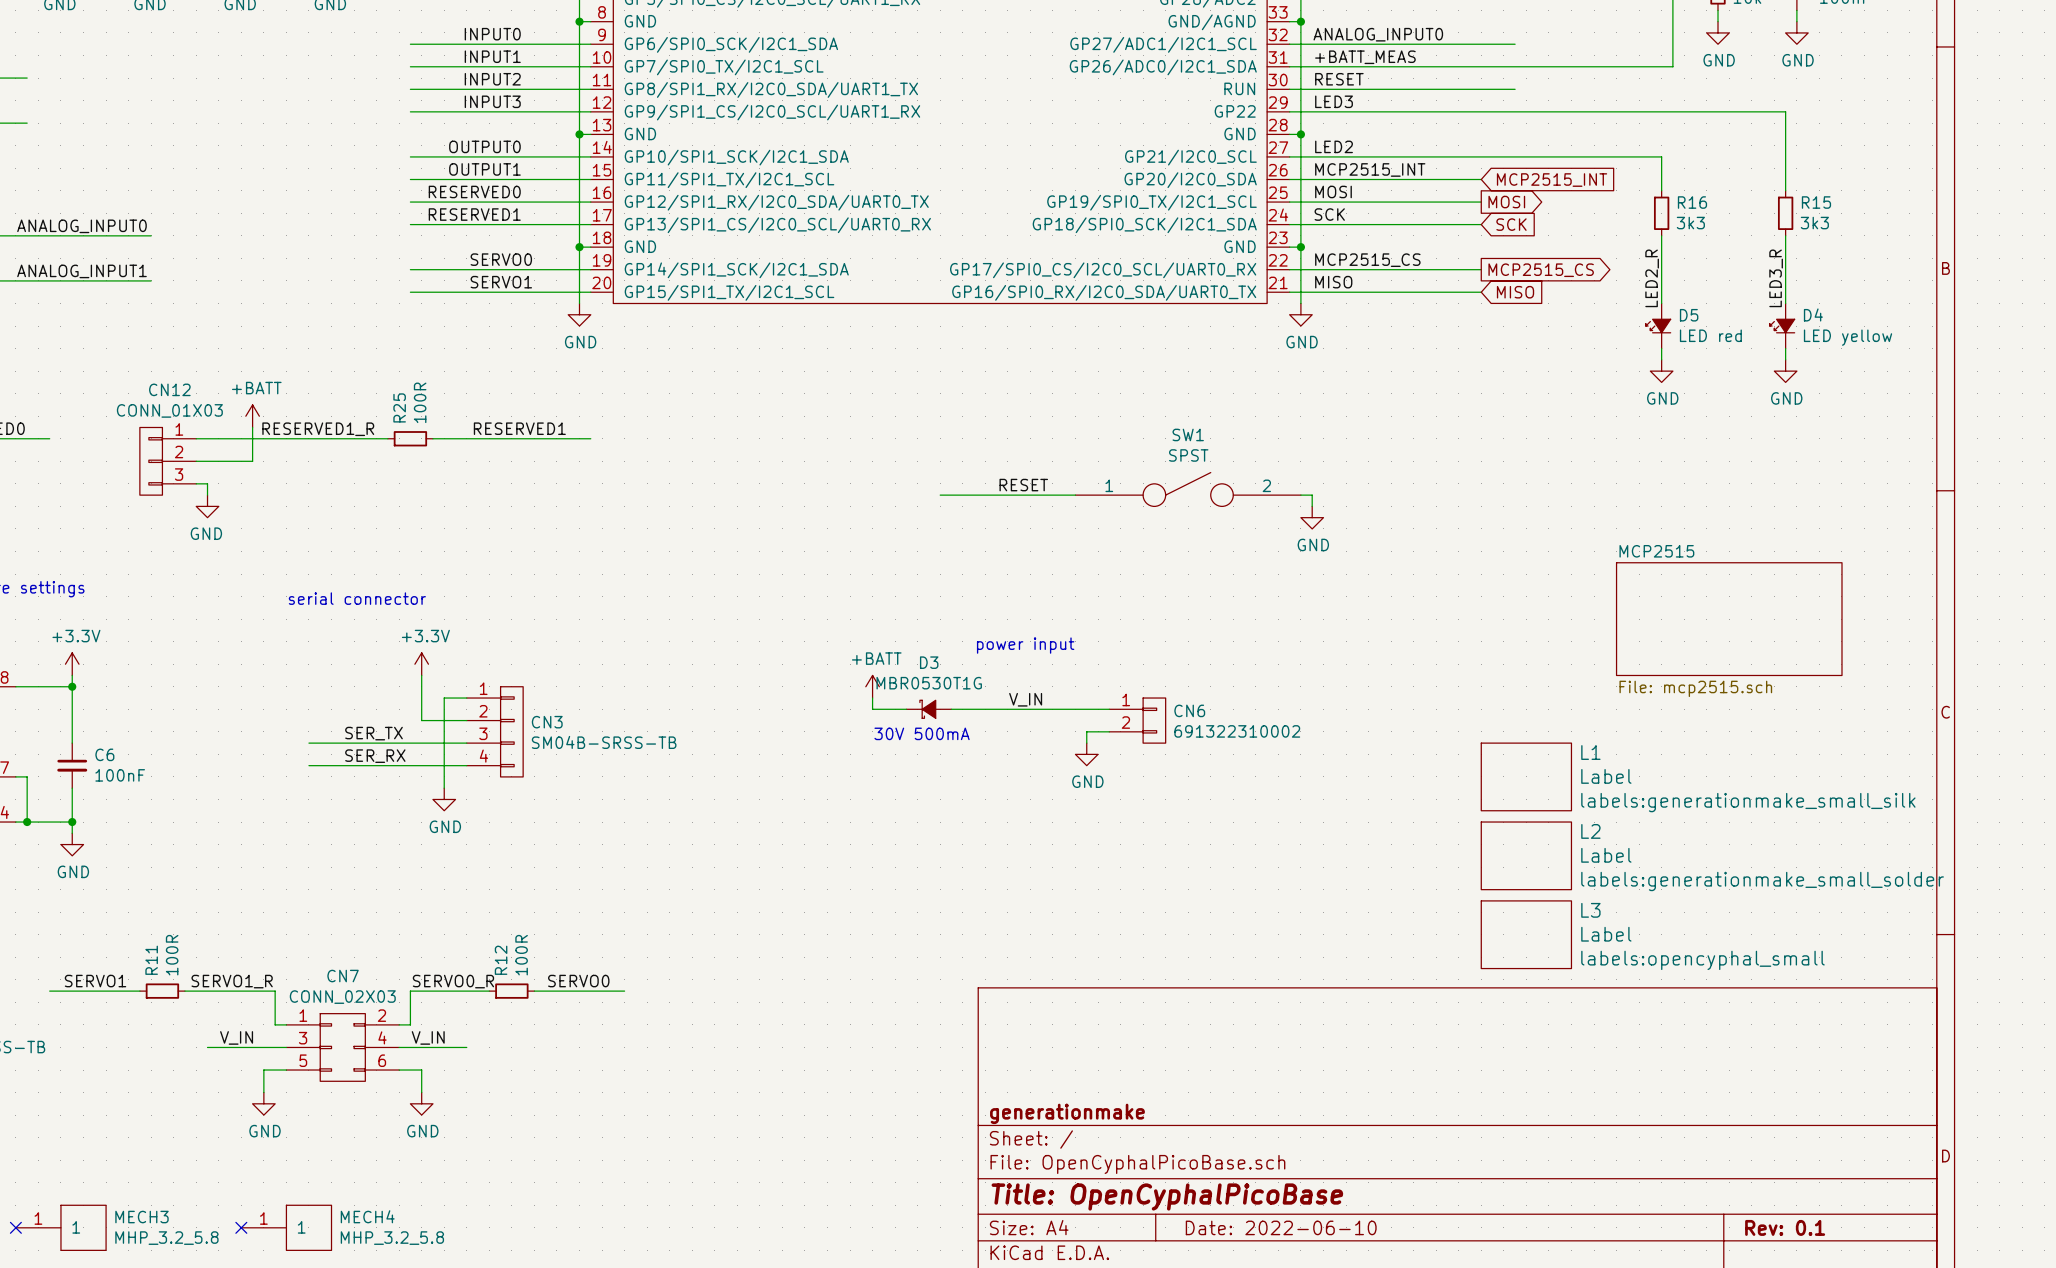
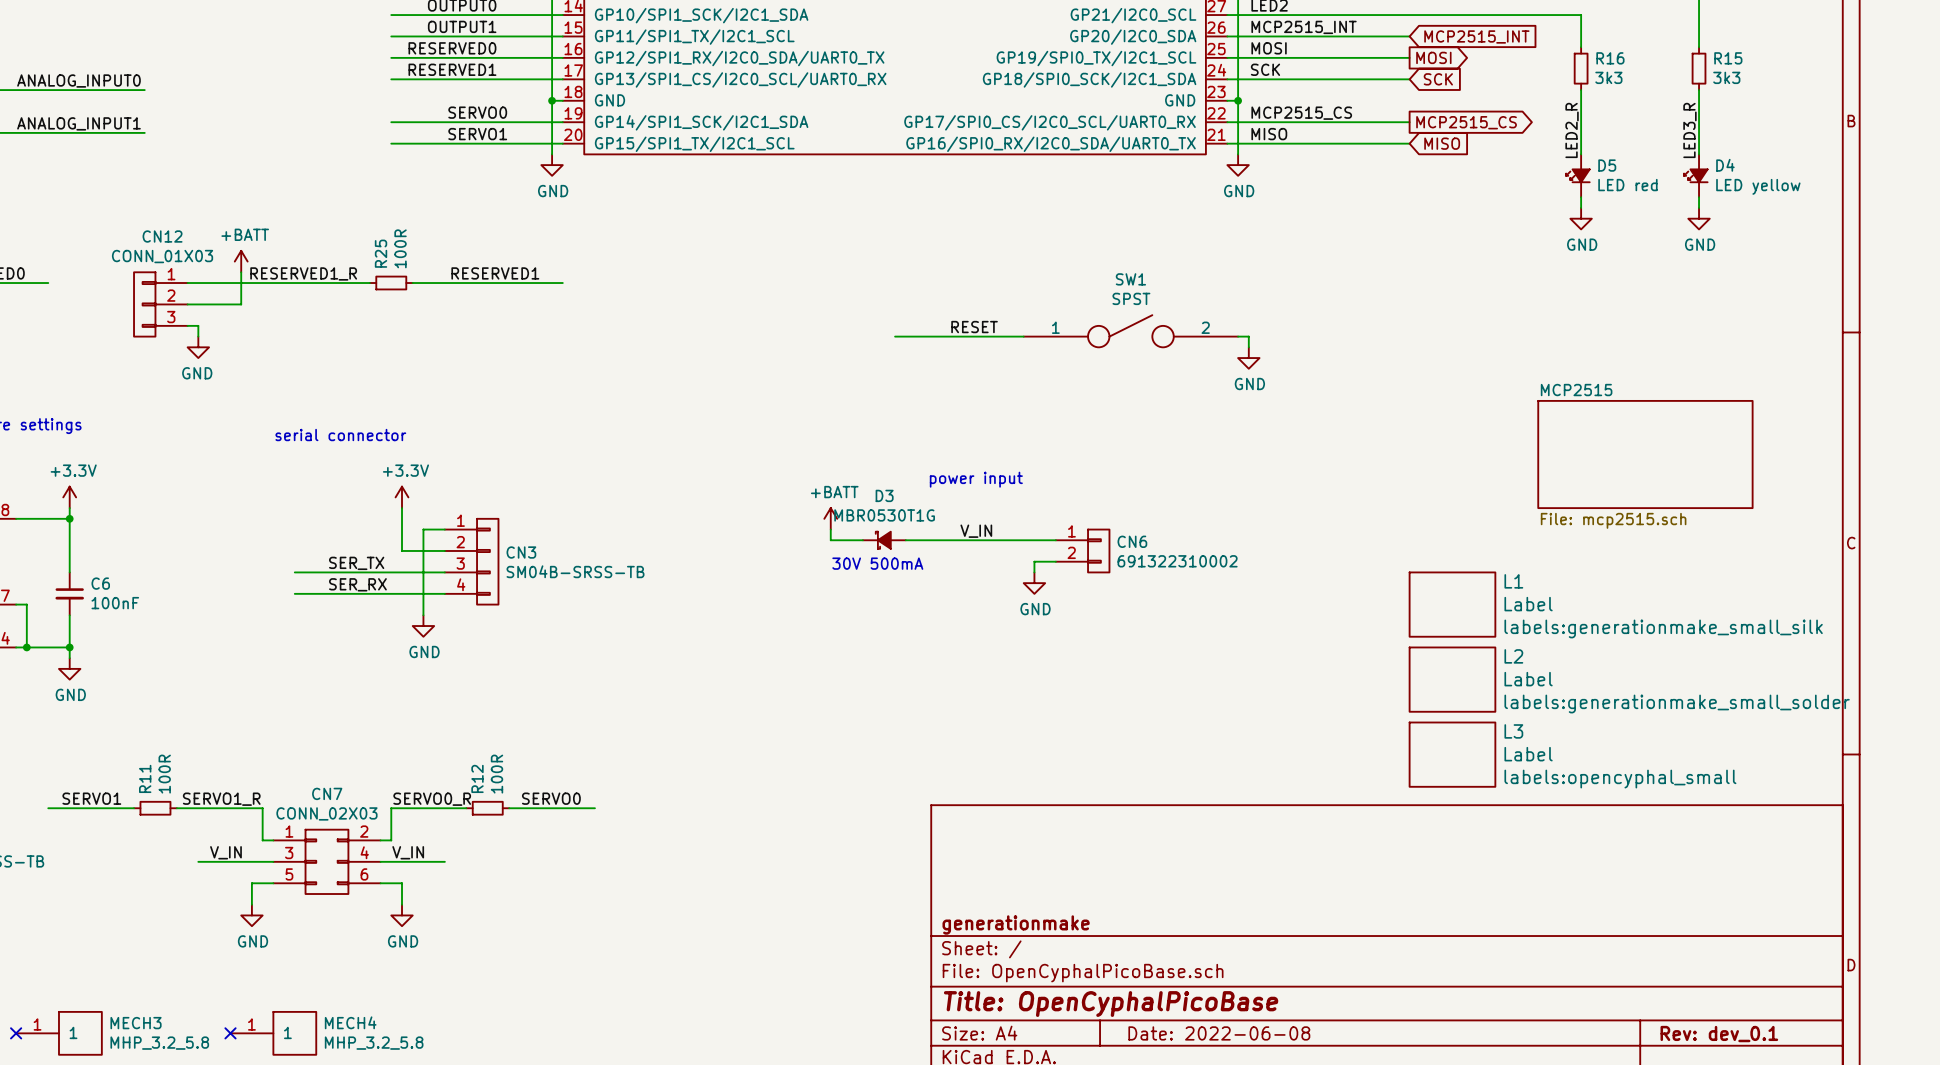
title block: Date: 2022-06-10 (1281, 1227) -> Date: 2022-06-08 (1219, 1033)
title block: Rev: 0.1 (1785, 1227) -> Rev: dev_0.1 (1719, 1034)

